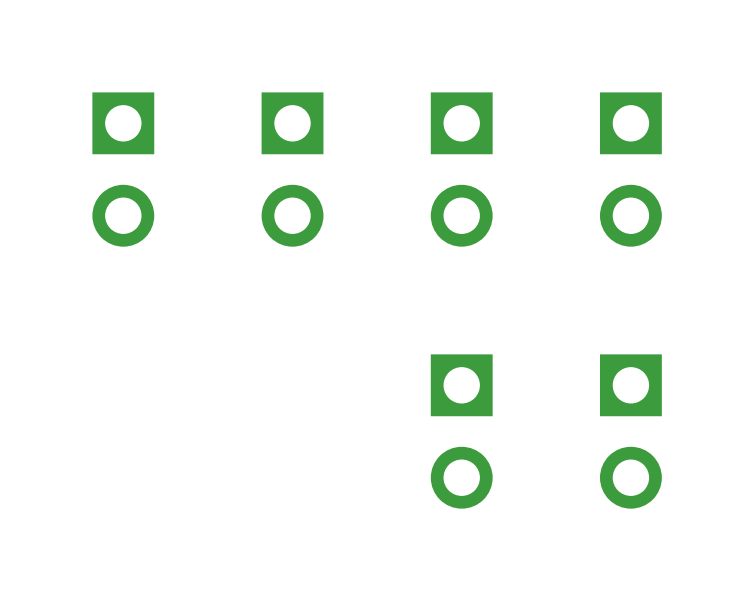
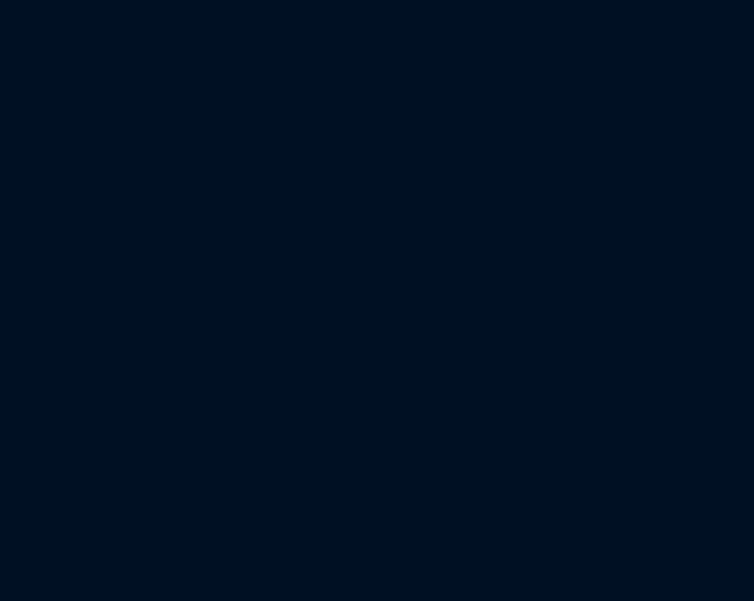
part: (123, 169) -> none
part: (292, 169) -> none
part: (461, 169) -> none
part: (630, 169) -> none
part: (461, 431) -> none
part: (630, 431) -> none

